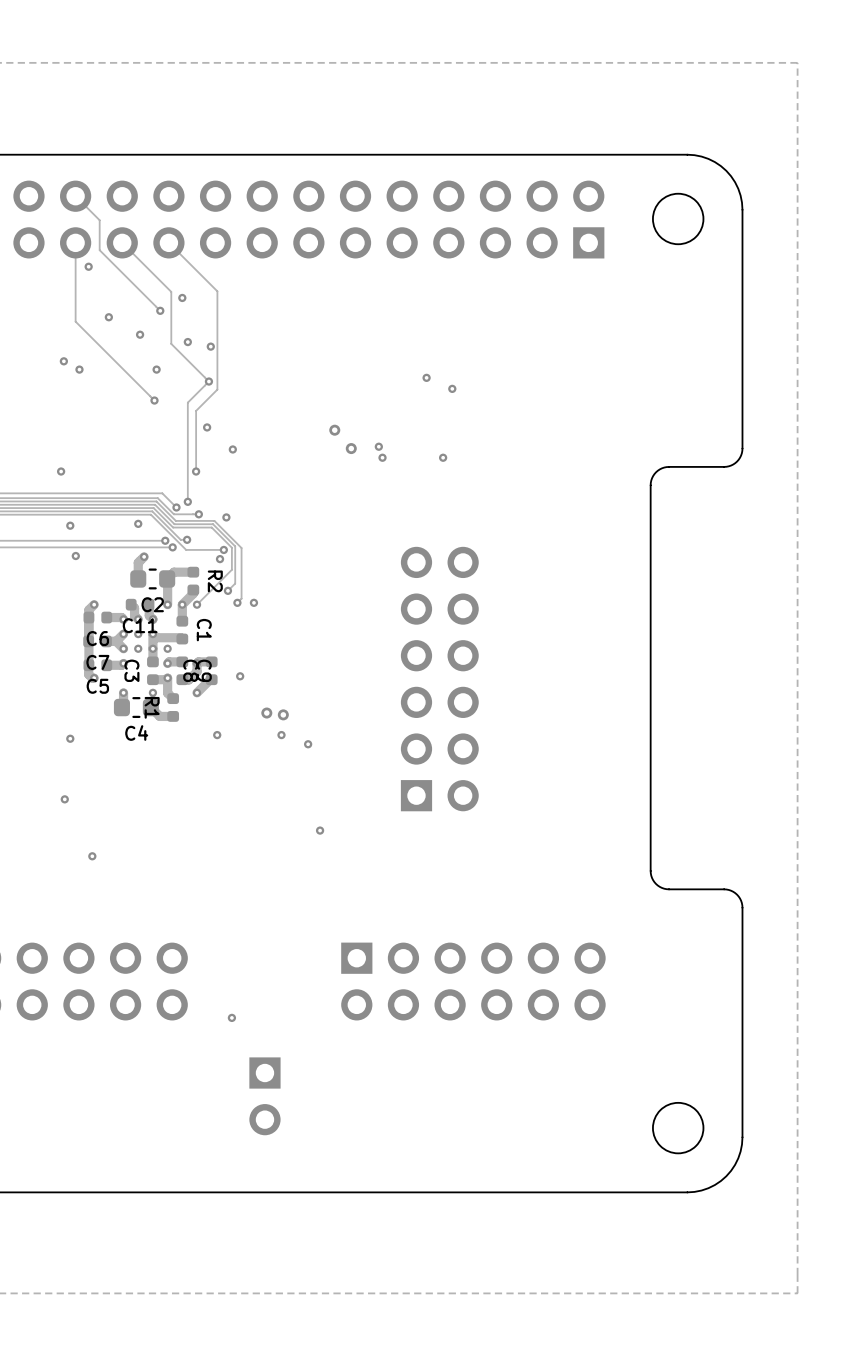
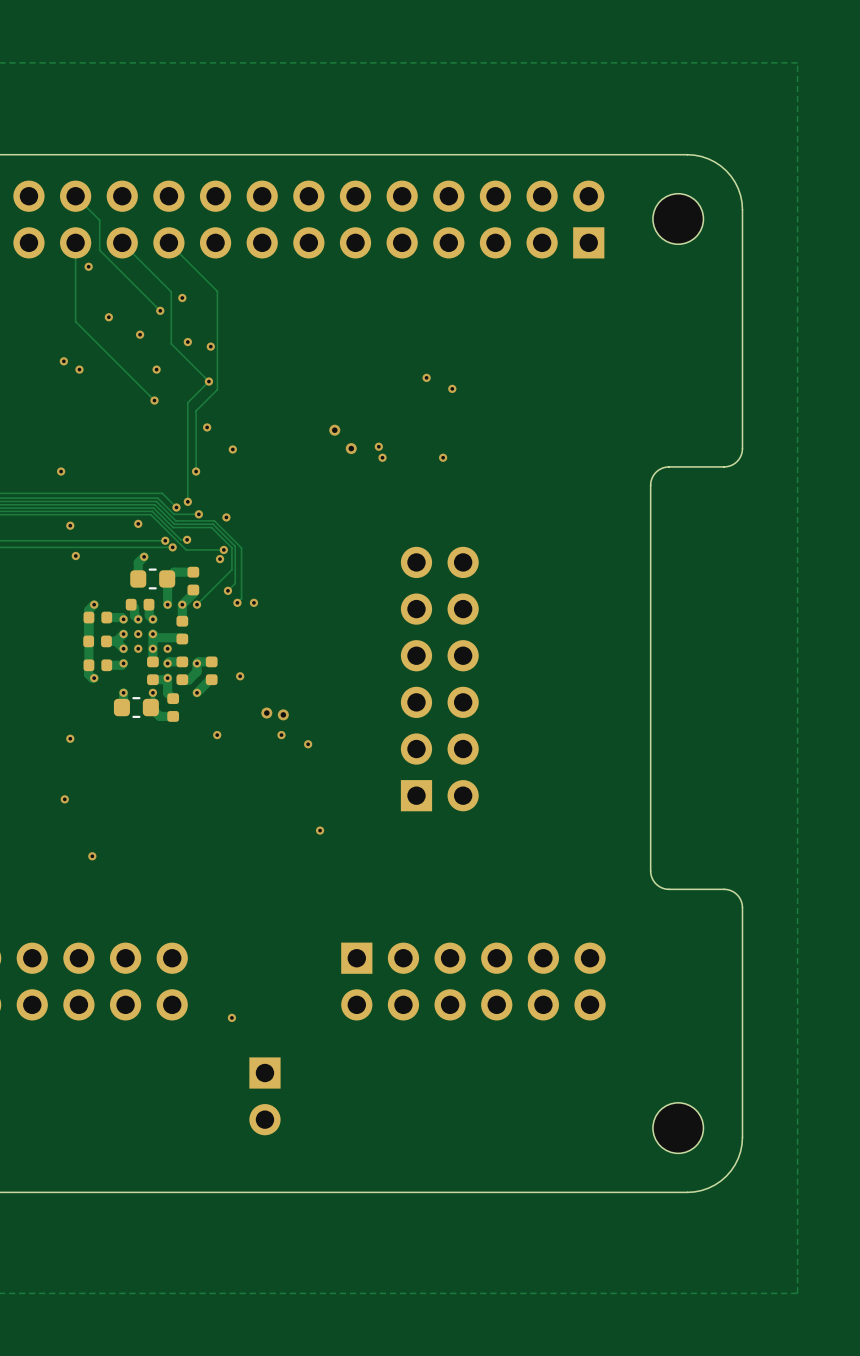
R2 name: R2 (215, 581) -> none
C2 name: C2 (152, 604) -> none
C11 name: C11 (140, 625) -> none
C1 name: C1 (204, 630) -> none
C6 name: C6 (97, 638) -> none
C7 name: C7 (97, 662) -> none
C3 name: C3 (131, 670) -> none
C8 name: C8 (190, 670) -> none
C9 name: C9 (204, 670) -> none
C5 name: C5 (97, 686) -> none
R1 name: R1 (152, 707) -> none
C4 name: C4 (136, 733) -> none

